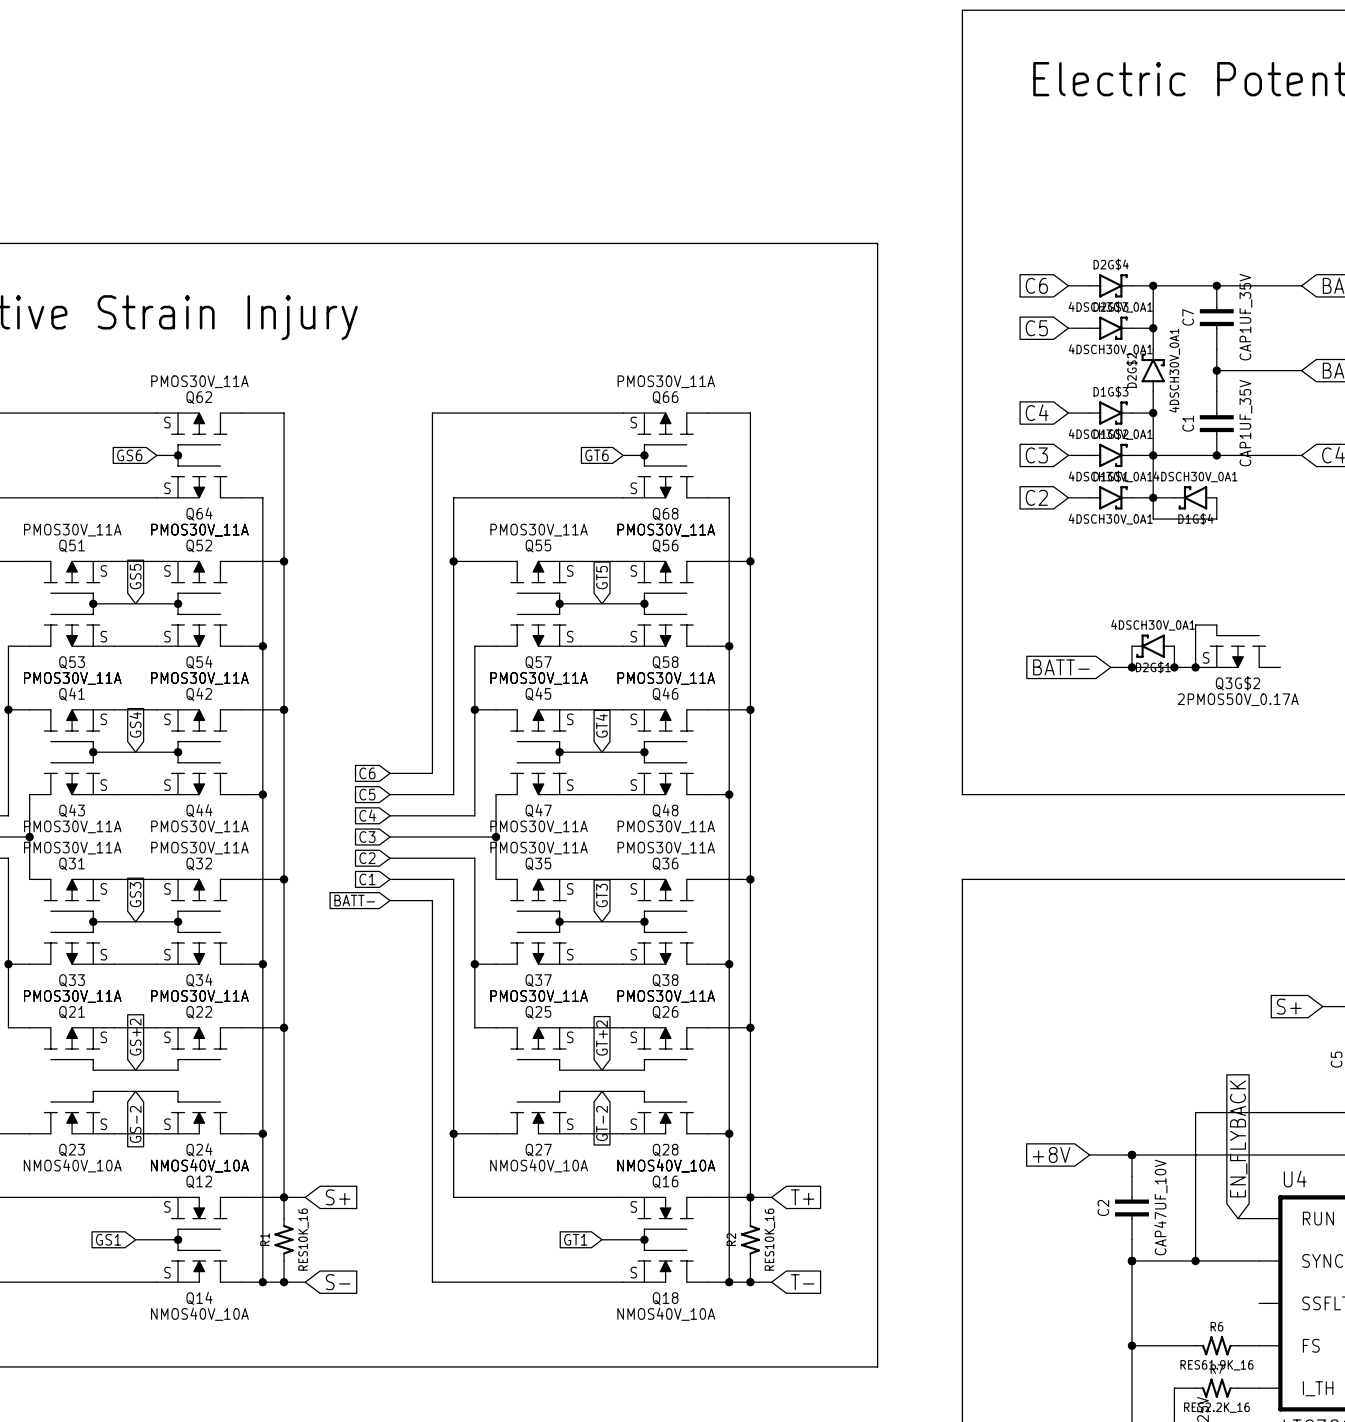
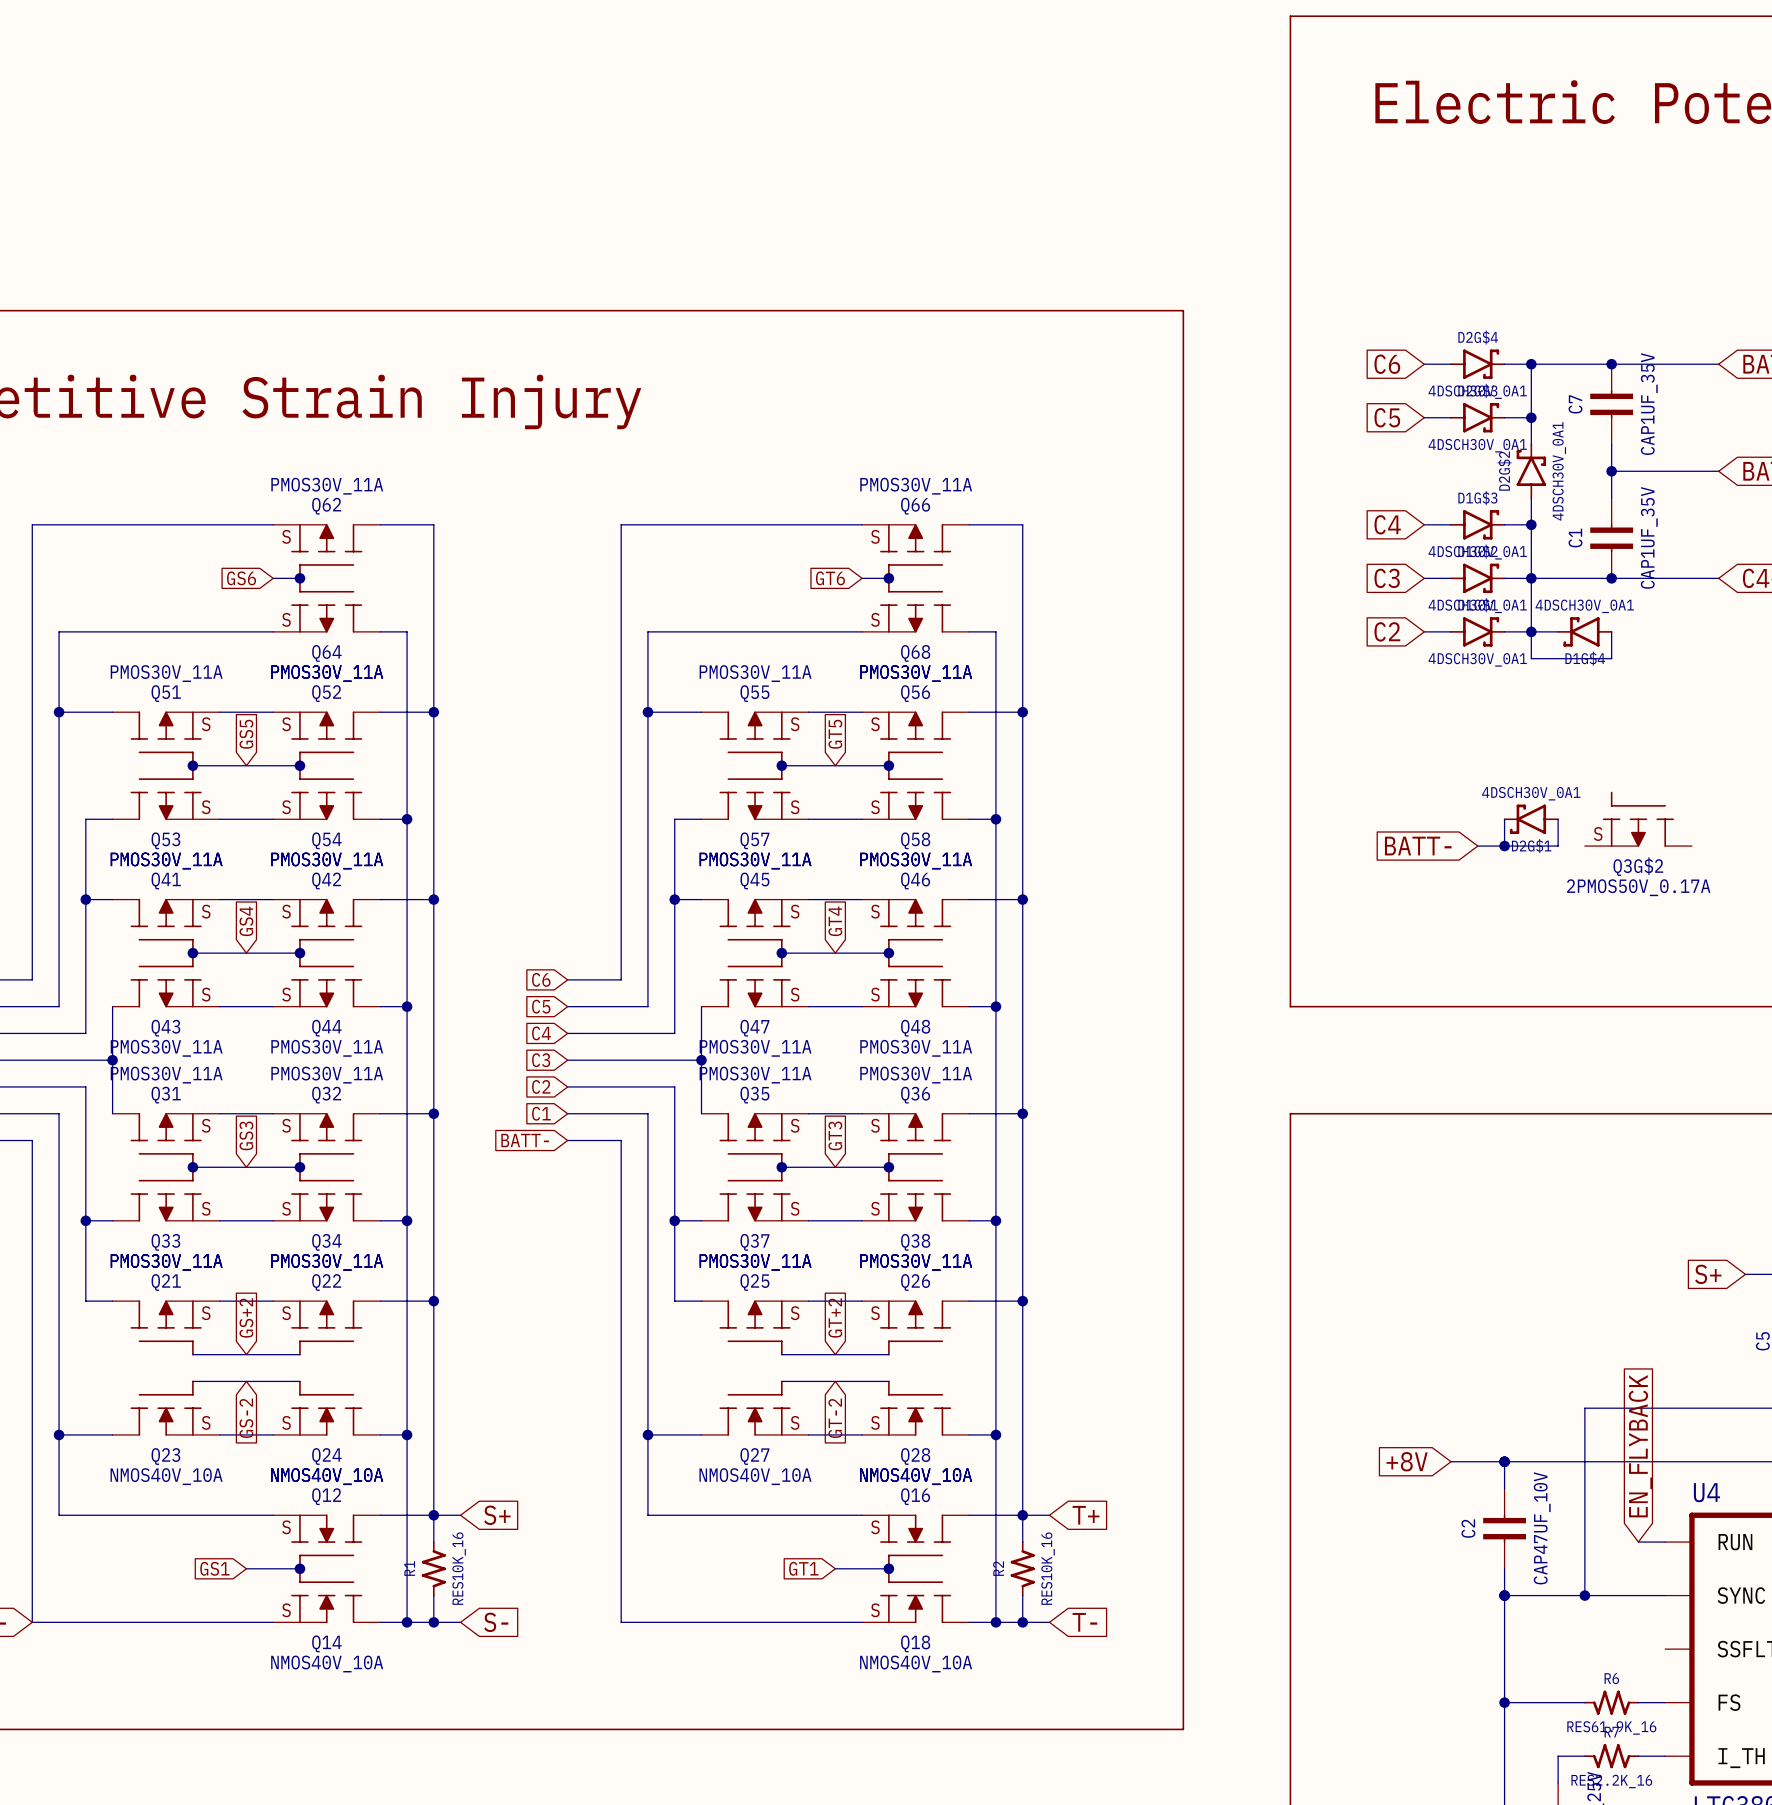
wire: (1216, 625) (1195, 625) (1195, 667) (1174, 667) -> none
junction: (1174, 667) -> none
junction: (1195, 667) -> none

